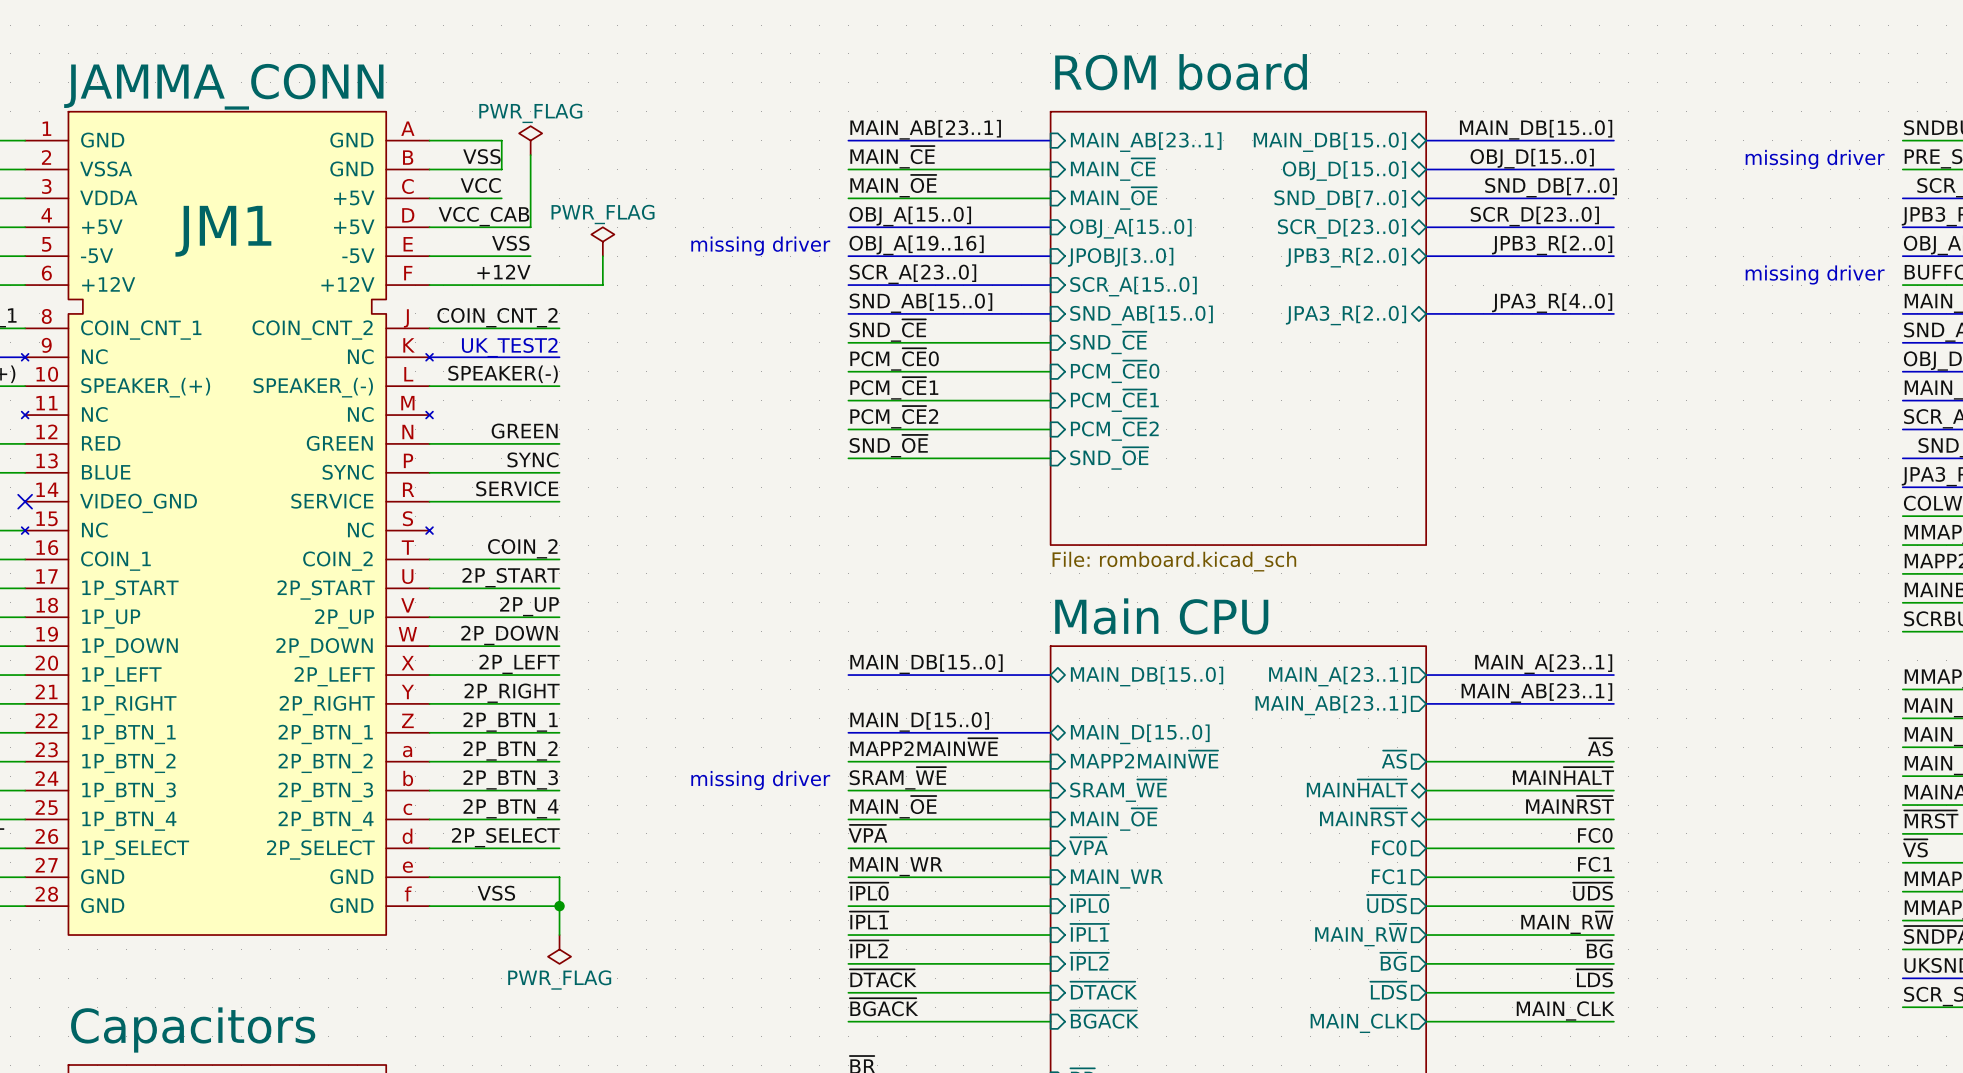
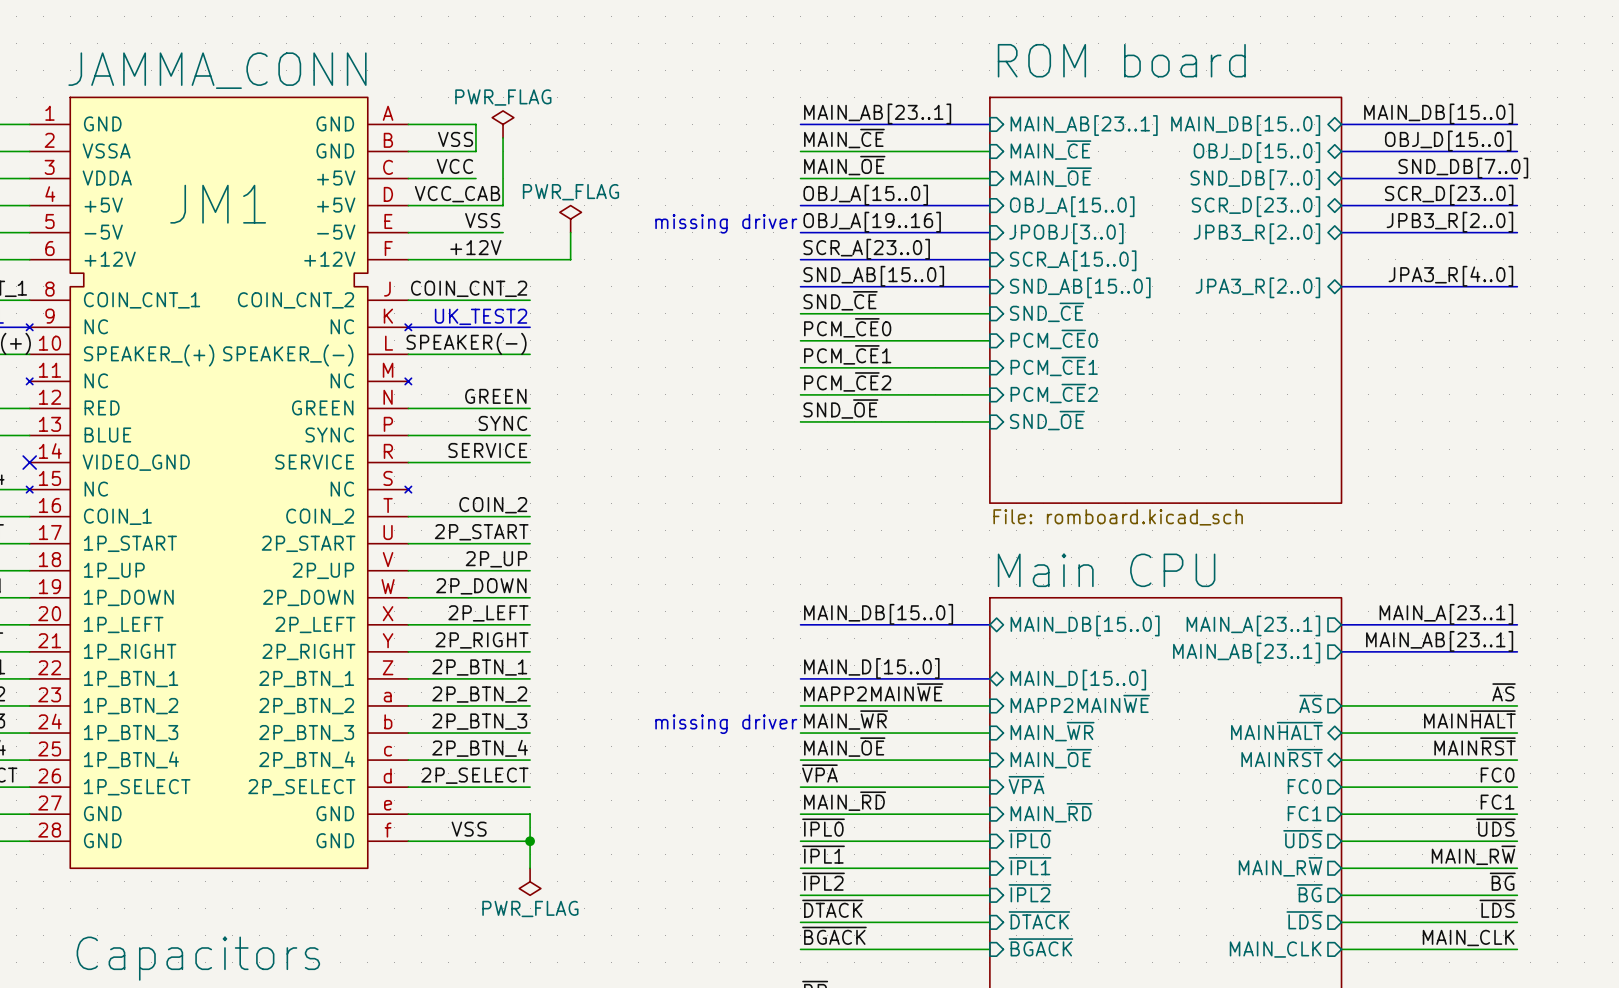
label: SRAM_~{WE} (897, 778) -> MAIN_~{WR} (846, 720)
sheet pin: SRAM_~{WE} (1118, 790) -> MAIN_~{WR} (1052, 731)
label: MAIN_WR (896, 866) -> MAIN_~{RD} (845, 801)
sheet pin: MAIN_WR (1116, 879) -> MAIN_~{RD} (1051, 812)

